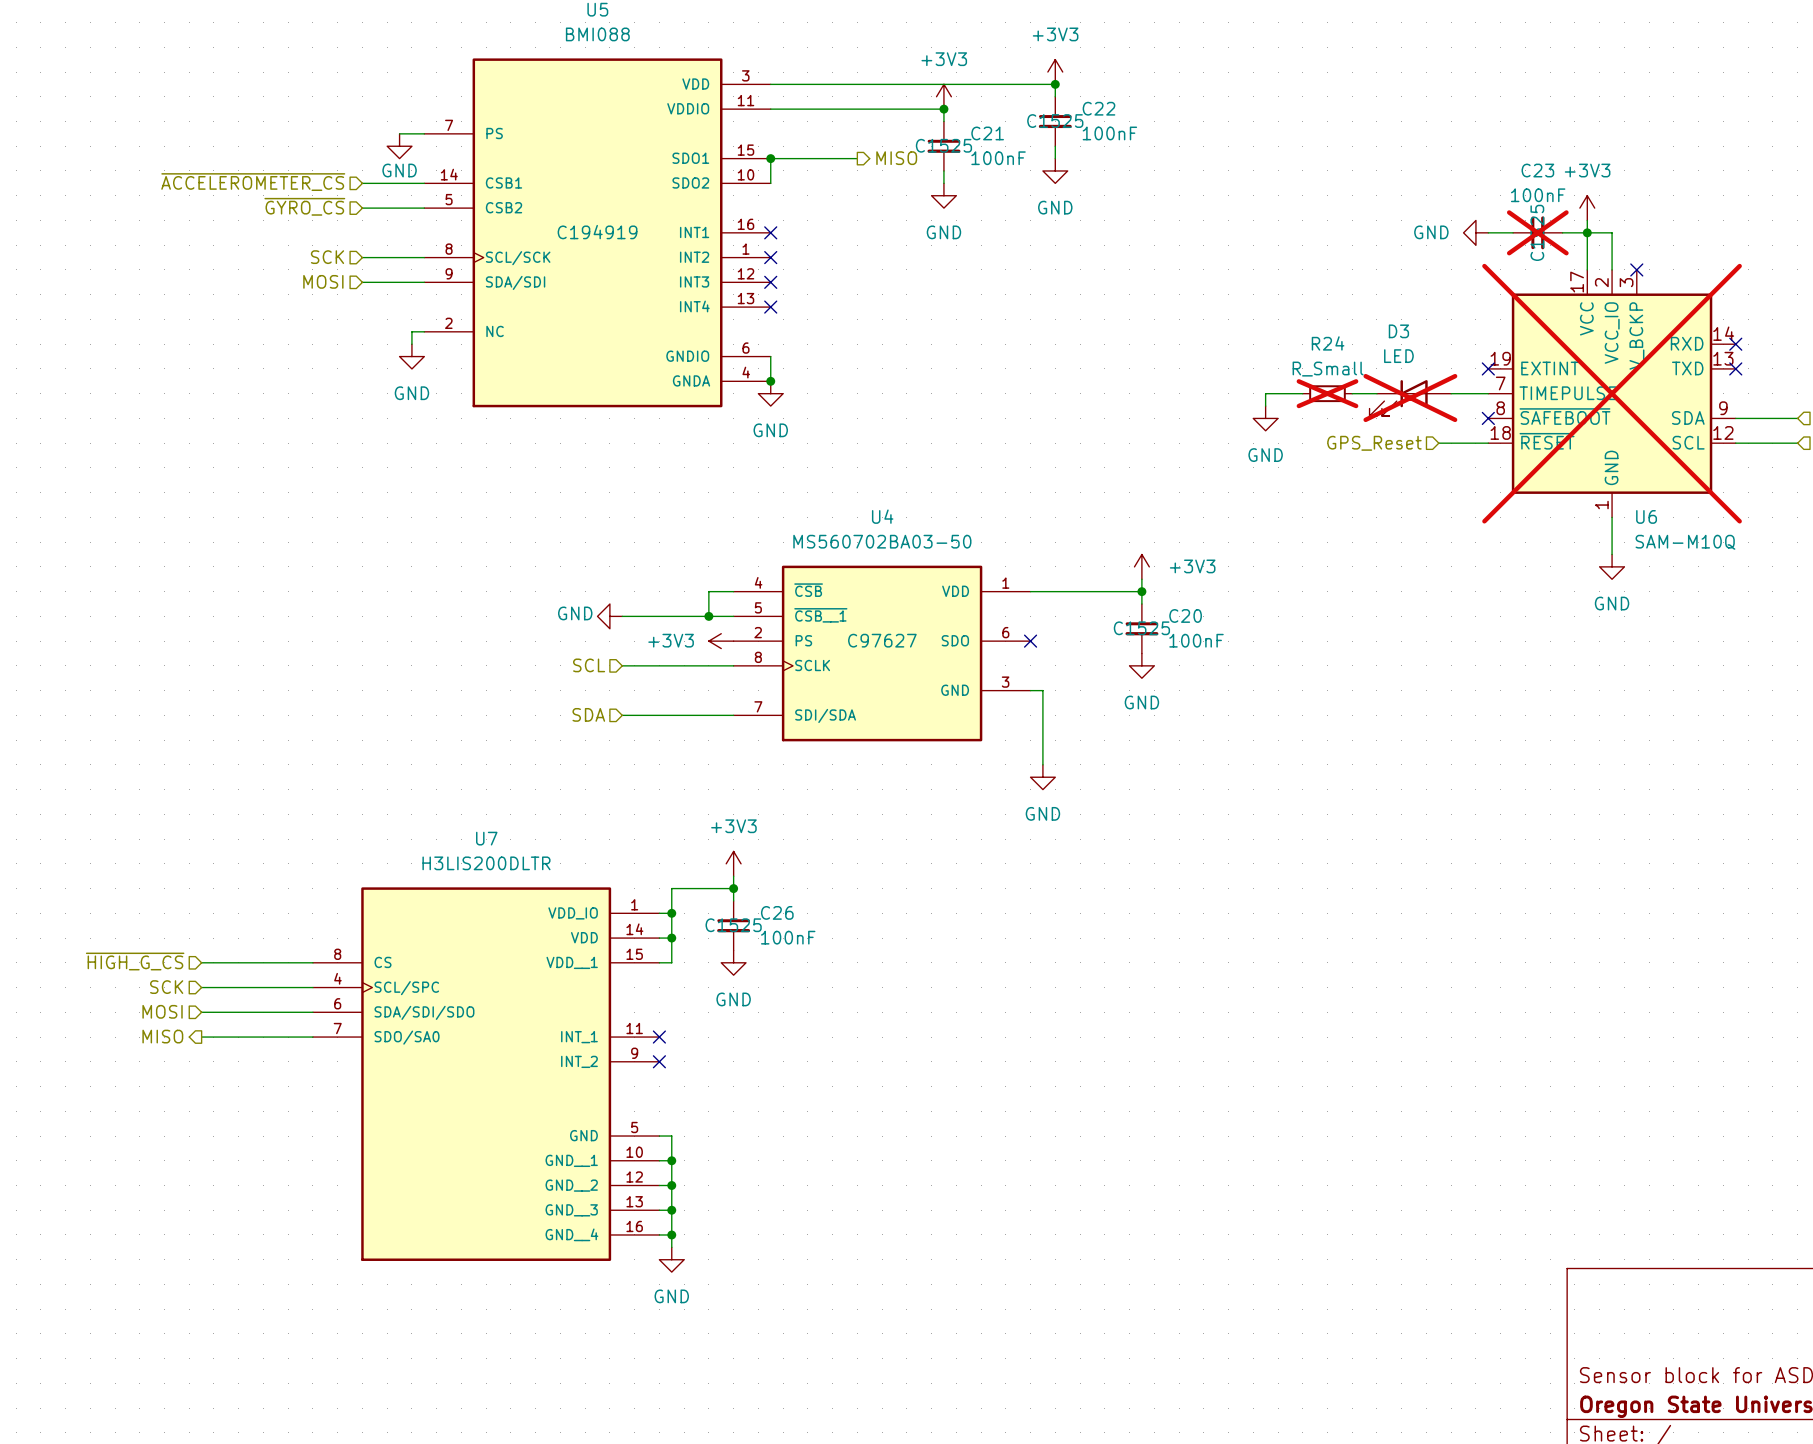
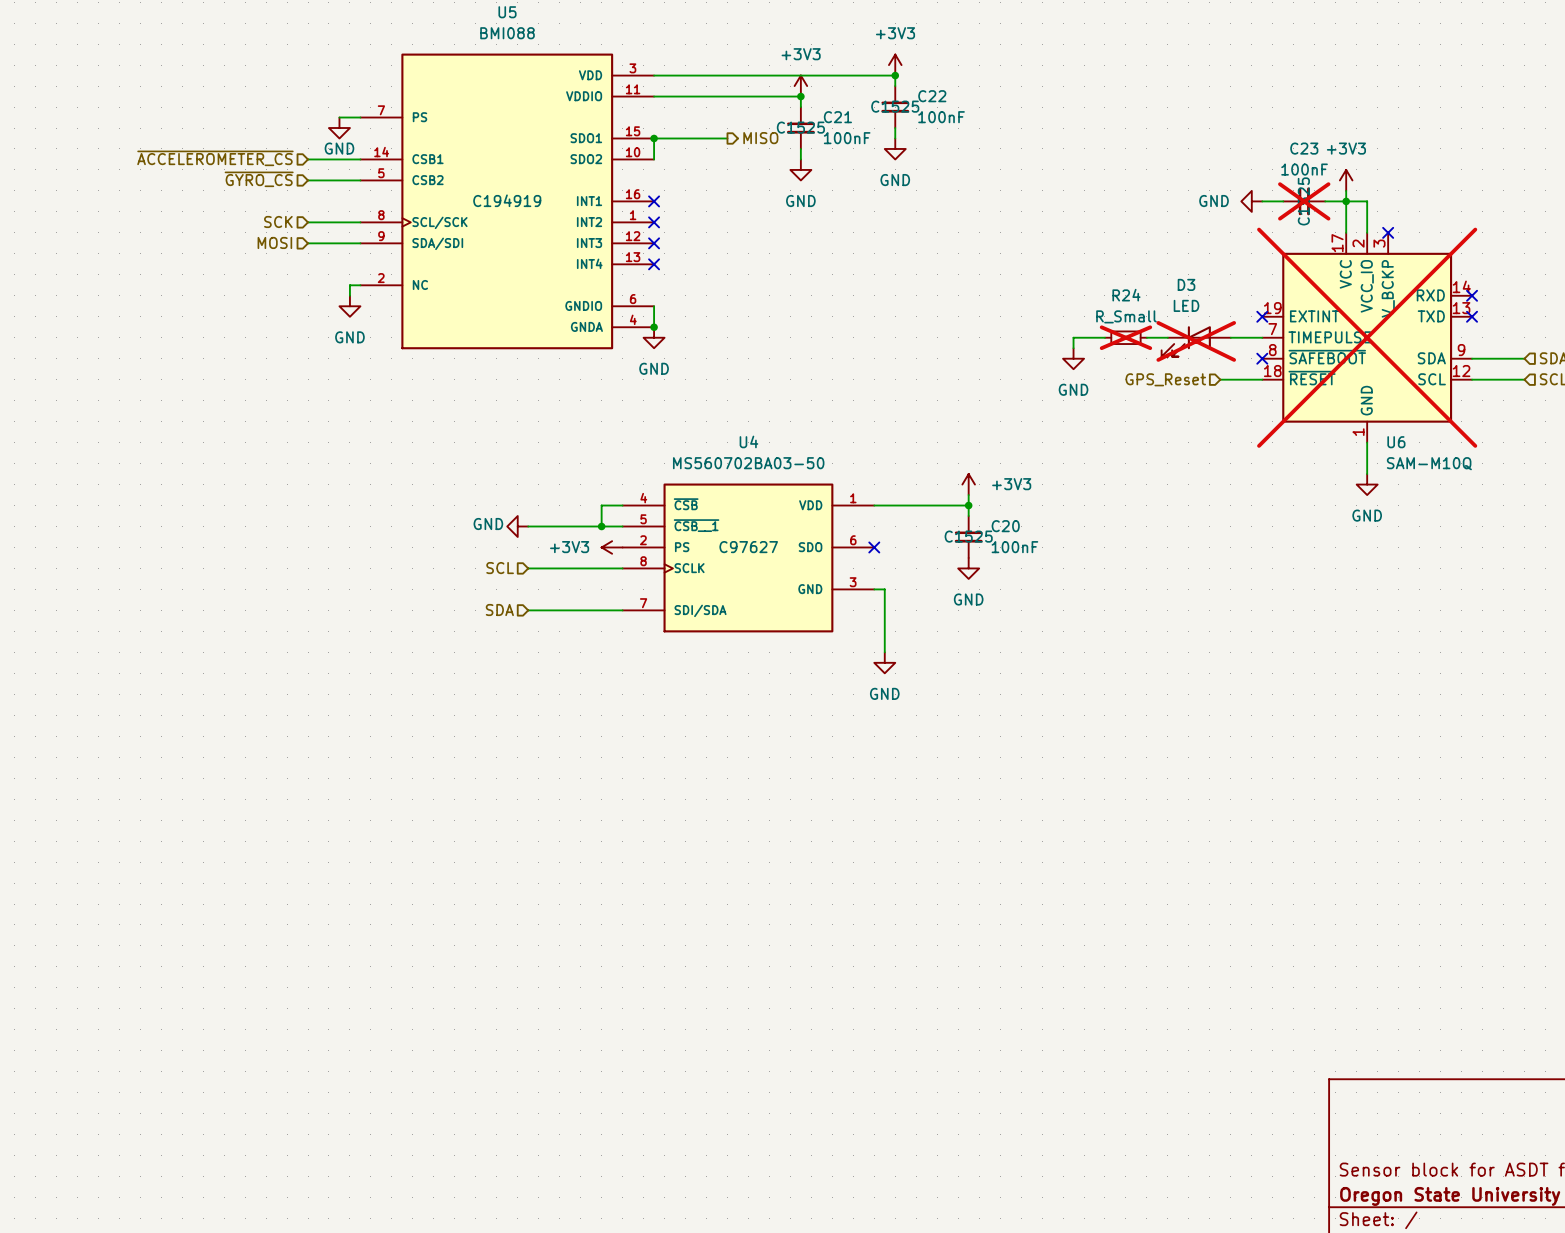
power symbol: +3V3 (733, 863) -> none
wire: (733, 876) (733, 900) -> none
wire: (733, 888) (671, 888) (671, 962) (659, 962) -> none
junction: (733, 888) -> none
wire: (659, 913) (671, 913) -> none
junction: (671, 913) -> none
C26: 100nF (733, 925) -> none
wire: (659, 938) (671, 938) -> none
junction: (671, 938) -> none
hierarchical label: ~{HIGH_G_CS} (135, 961) -> none
wire: (201, 962) (312, 962) -> none
power symbol: GND (733, 962) -> none
hierarchical label: SCK (166, 987) -> none
wire: (201, 987) (312, 987) -> none
hierarchical label: MOSI (162, 1011) -> none
wire: (201, 1012) (312, 1012) -> none
hierarchical label: MISO (162, 1036) -> none
wire: (201, 1037) (312, 1037) -> none
no-connect mark: (659, 1037) -> none
no-connect mark: (659, 1061) -> none
U7: H3LIS200DLTR (486, 1074) -> none
wire: (659, 1136) (671, 1136) (671, 1247) -> none
wire: (659, 1160) (671, 1160) -> none
junction: (671, 1160) -> none
wire: (659, 1185) (671, 1185) -> none
junction: (671, 1185) -> none
wire: (659, 1210) (671, 1210) -> none
junction: (671, 1210) -> none
wire: (659, 1234) (671, 1234) -> none
junction: (671, 1234) -> none
power symbol: GND (671, 1259) -> none

